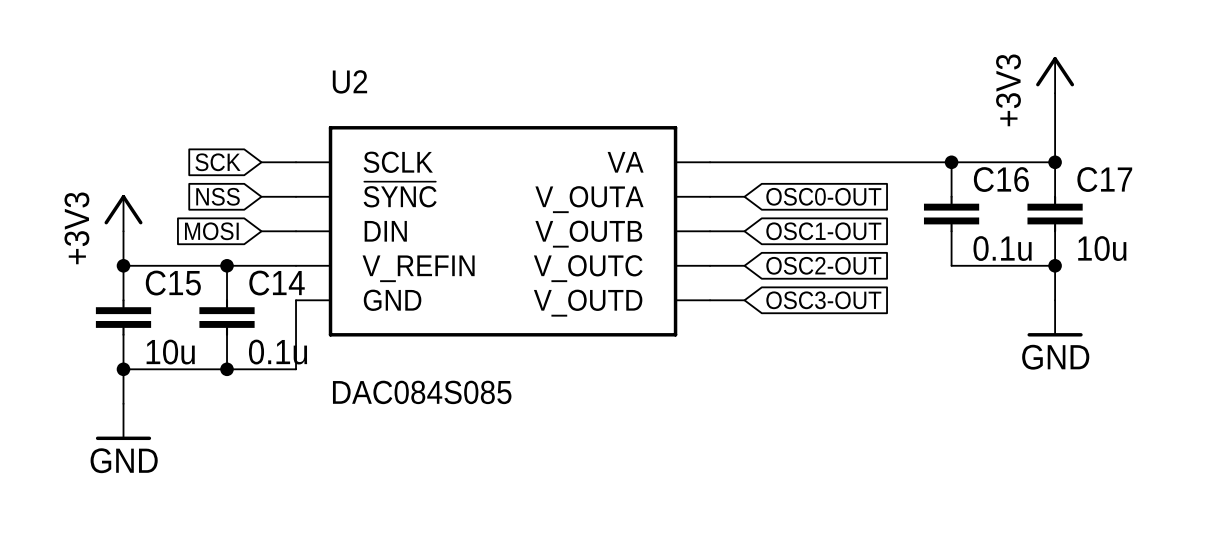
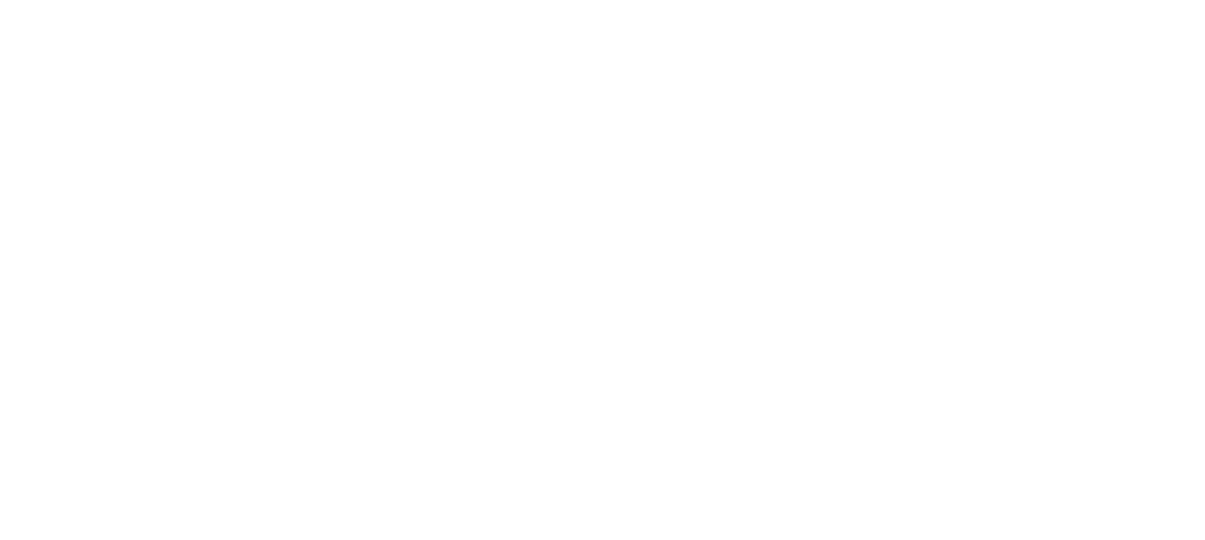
power symbol: +3V3 (1055, 75) -> none
wire: (1055, 93) (1055, 162) (710, 162) -> none
global label: SCK (217, 162) -> none
wire: (261, 162) (296, 162) -> none
junction: (951, 162) -> none
junction: (1055, 162) -> none
global label: NSS (218, 196) -> none
wire: (261, 196) (296, 196) -> none
wire: (710, 196) (744, 196) -> none
global label: OSC0-OUT (823, 196) -> none
power symbol: +3V3 (123, 213) -> none
C16: 0.1u (951, 214) -> none
C17: 10u (1055, 214) -> none
wire: (123, 231) (123, 265) (296, 265) -> none
global label: MOSI (211, 231) -> none
wire: (261, 231) (296, 231) -> none
U2: DAC084S085 (503, 231) -> none
wire: (710, 231) (744, 231) -> none
global label: OSC1-OUT (823, 231) -> none
junction: (123, 265) -> none
junction: (227, 265) -> none
wire: (710, 265) (744, 265) -> none
global label: OSC2-OUT (823, 265) -> none
wire: (951, 265) (1055, 265) (1055, 300) -> none
junction: (1055, 265) -> none
wire: (296, 300) (296, 369) (123, 369) (123, 403) -> none
wire: (710, 300) (744, 300) -> none
global label: OSC3-OUT (823, 300) -> none
C15: 10u (123, 317) -> none
C14: 0.1u (227, 317) -> none
power symbol: GND (1055, 318) -> none
junction: (123, 369) -> none
junction: (227, 369) -> none
power symbol: GND (123, 421) -> none

